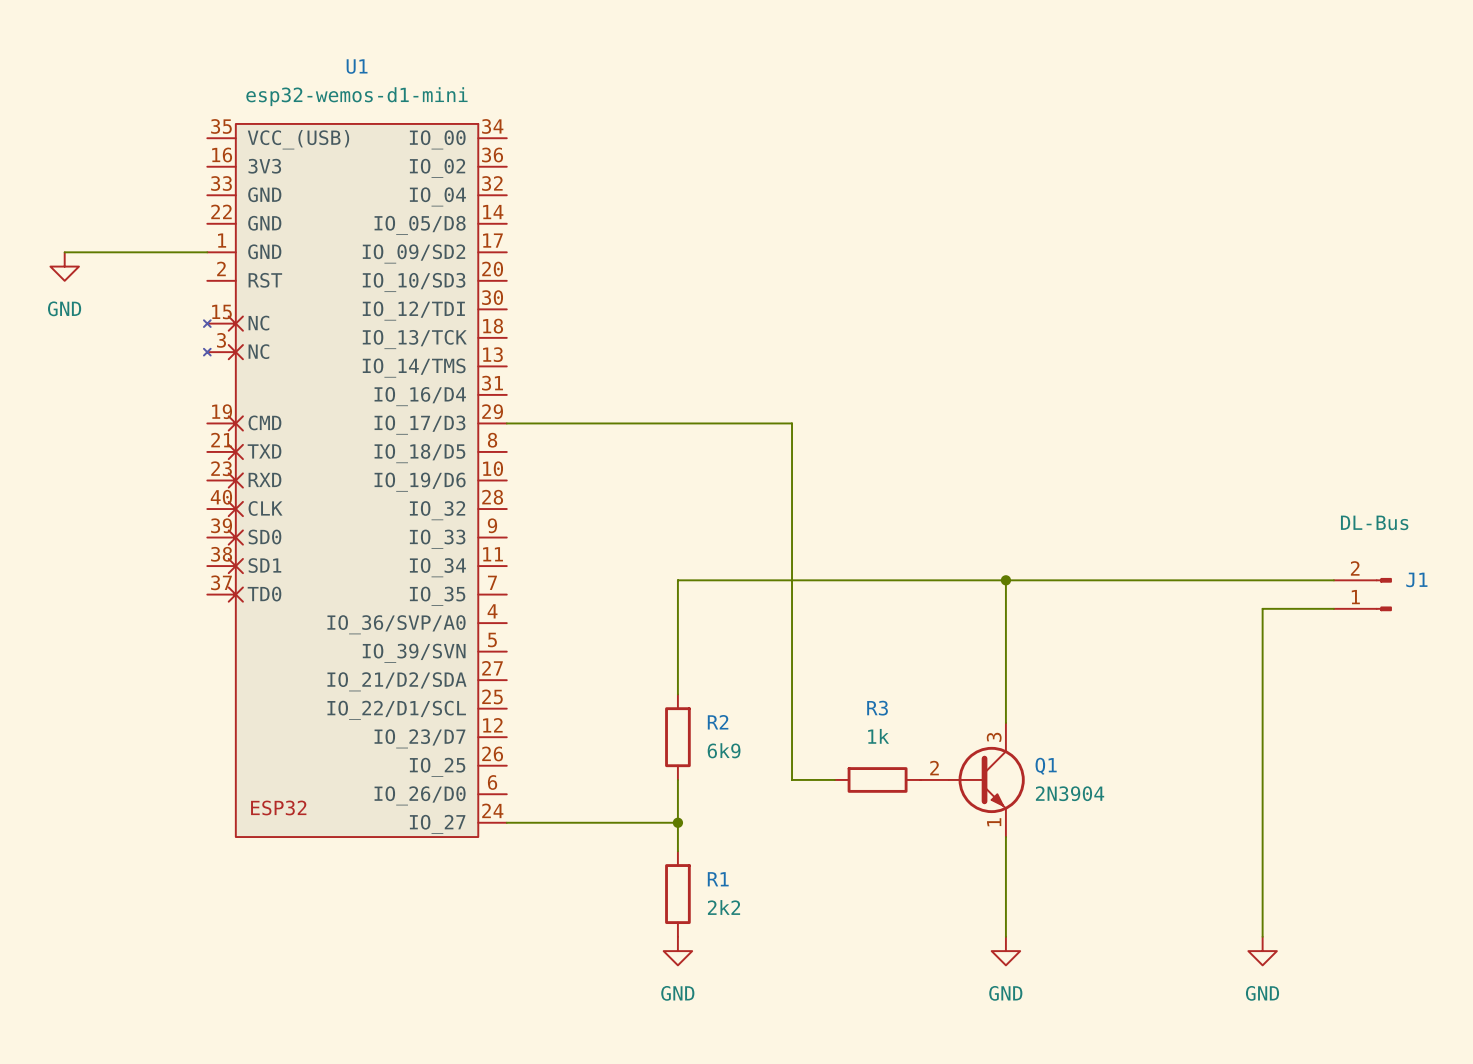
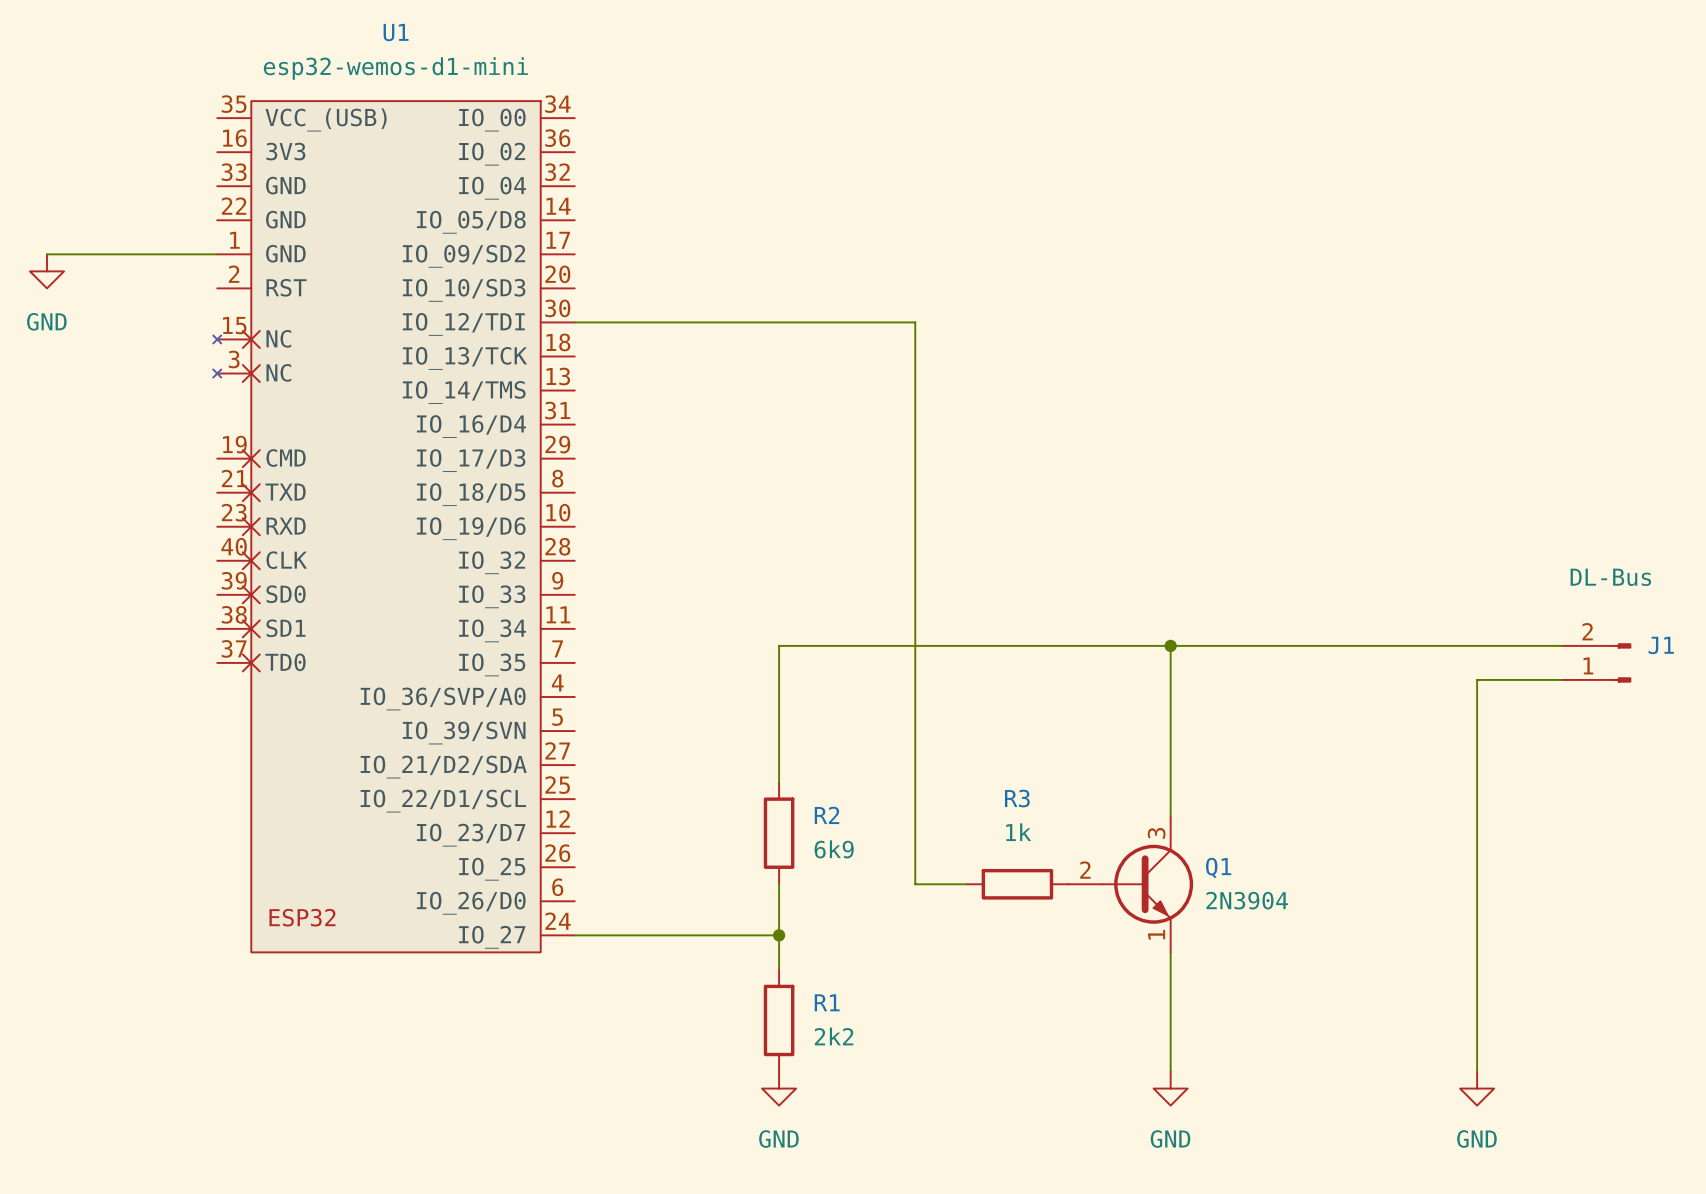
wire: (506, 423) (792, 423) -> (574, 322) (915, 322) (915, 458)

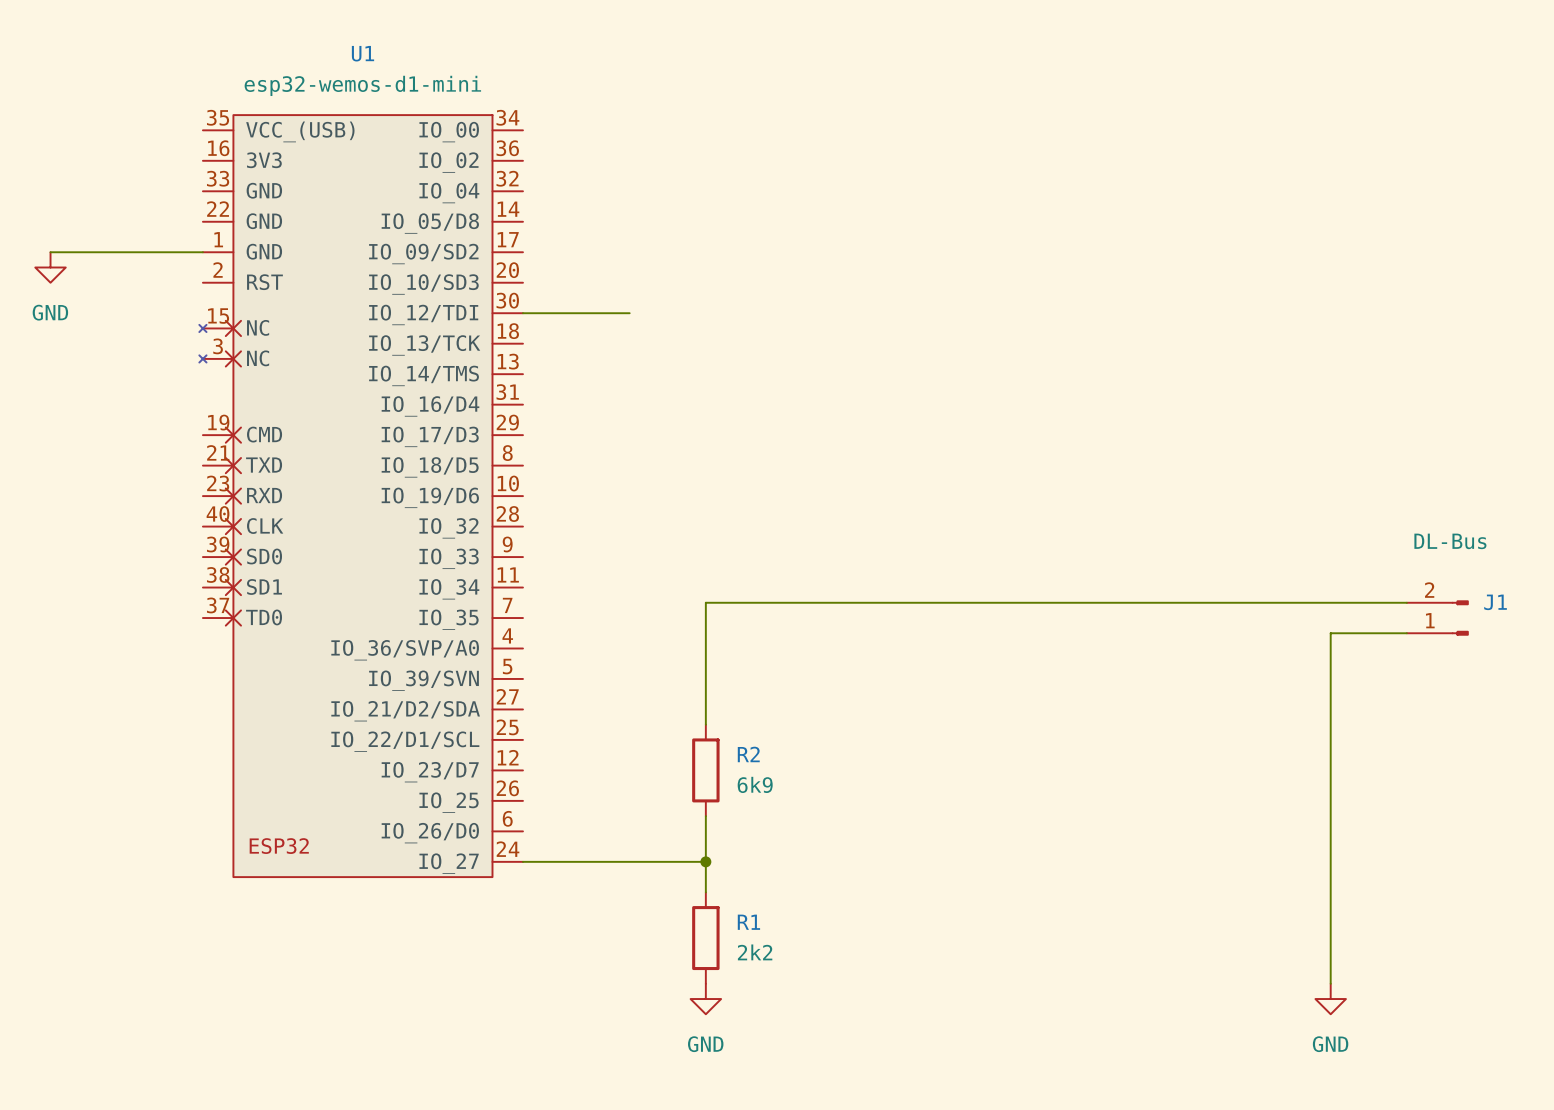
wire: (693, 322) (915, 322) (915, 884) (966, 884) -> none
wire: (1170, 645) (1170, 816) -> none
junction: (1170, 645) -> none
R3: 1k (1017, 884) -> none
Q1: 2N3904 (1130, 884) -> none
wire: (1170, 952) (1170, 1071) -> none
power symbol: GND (1170, 1088) -> none

